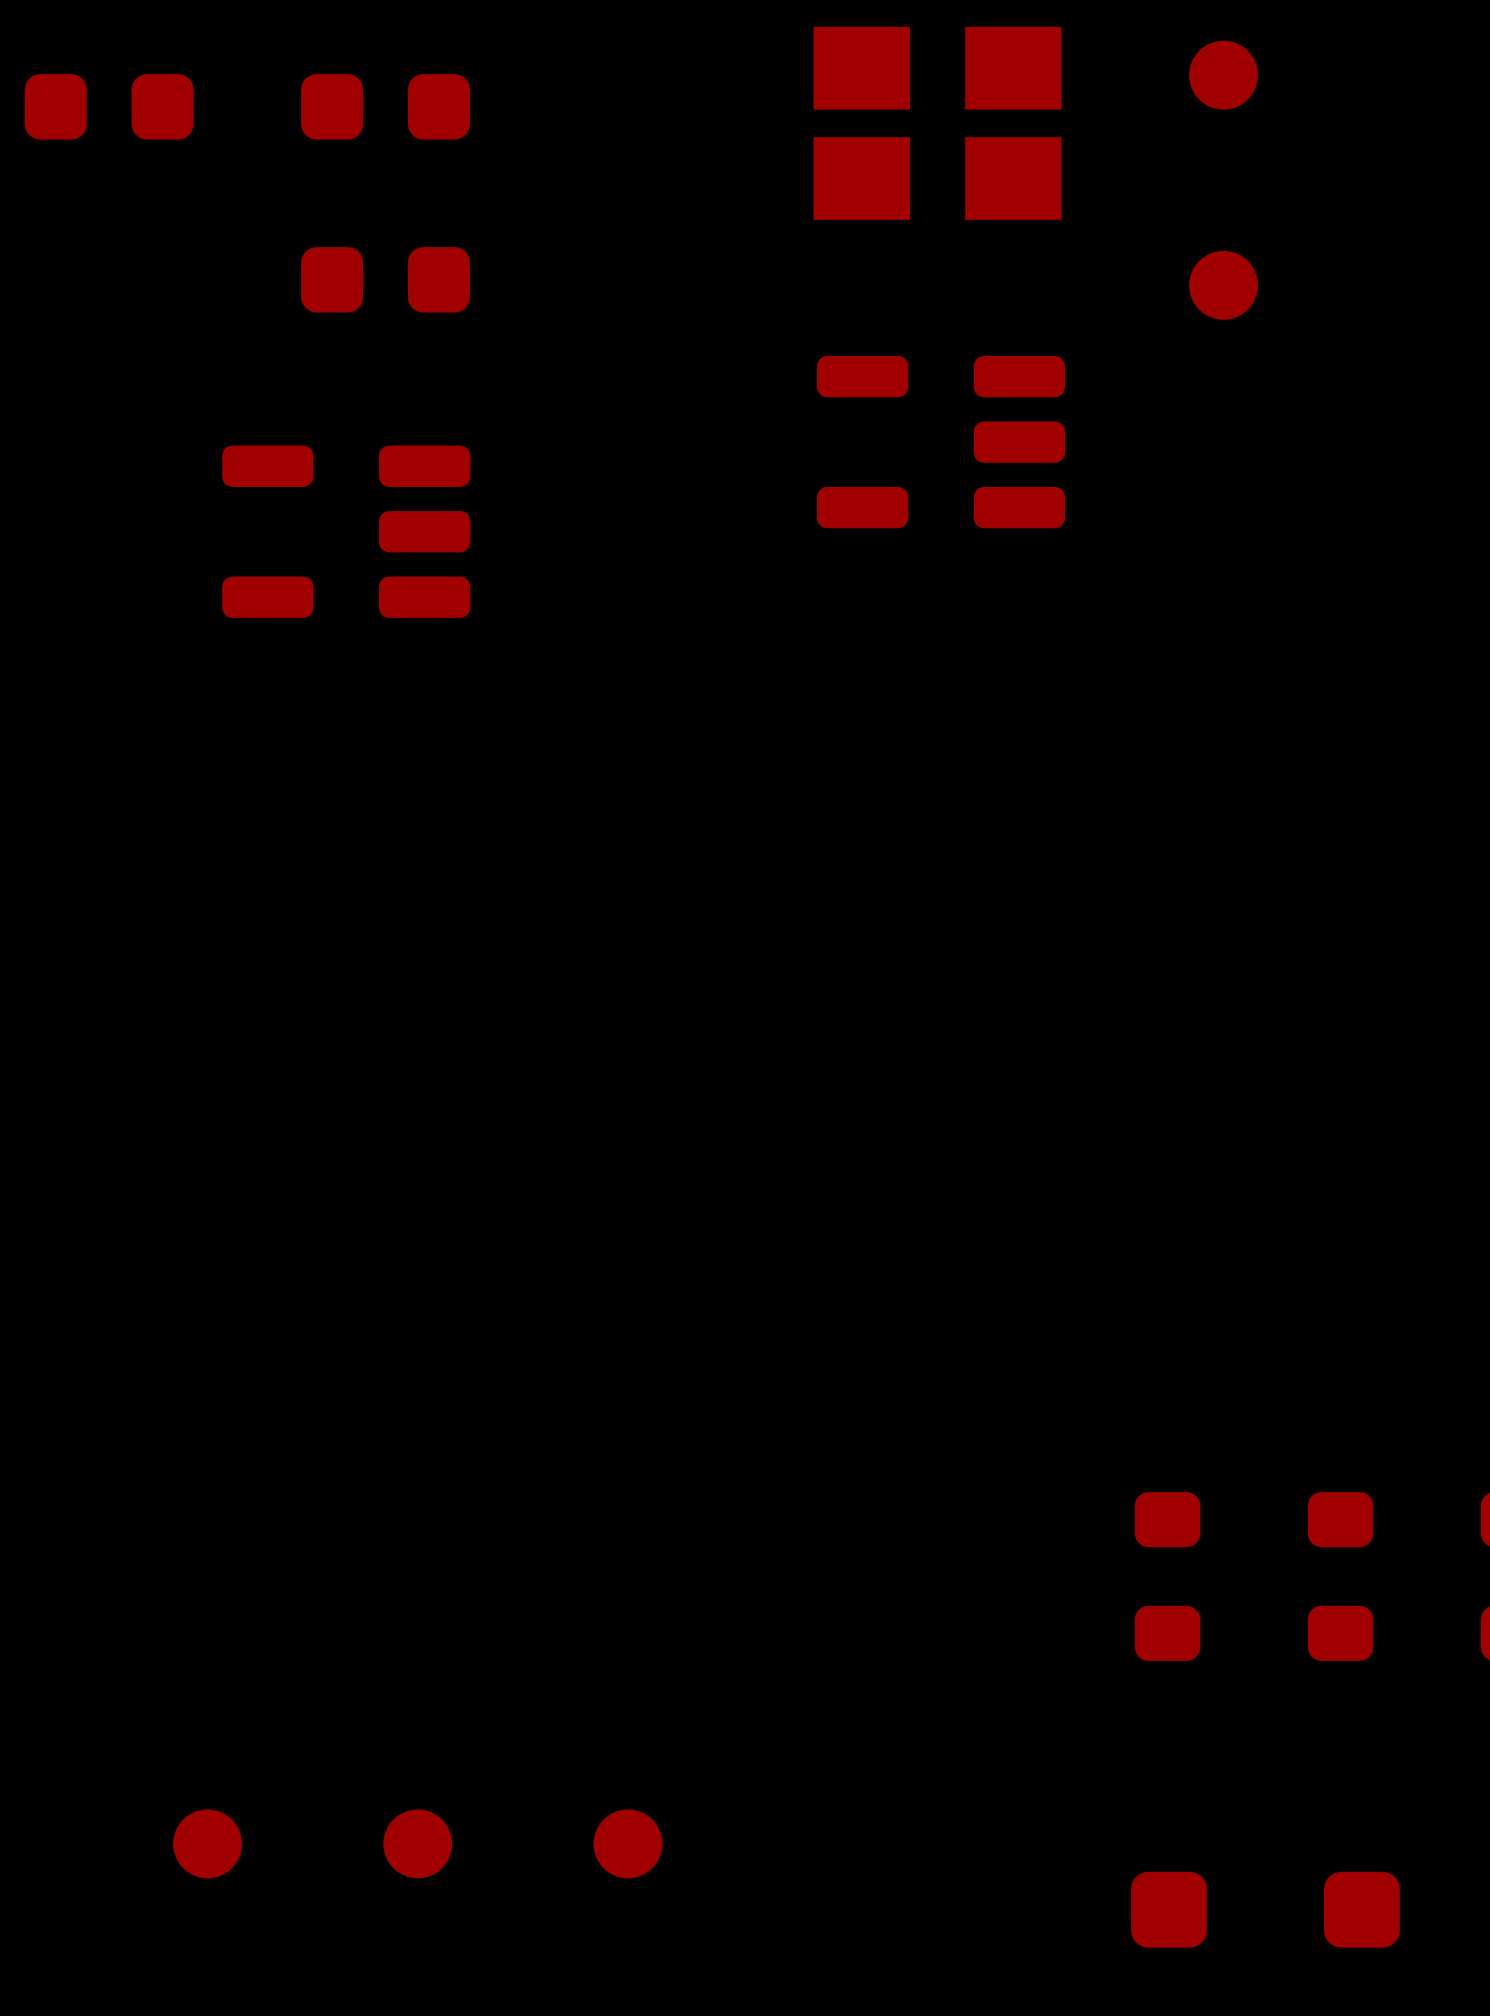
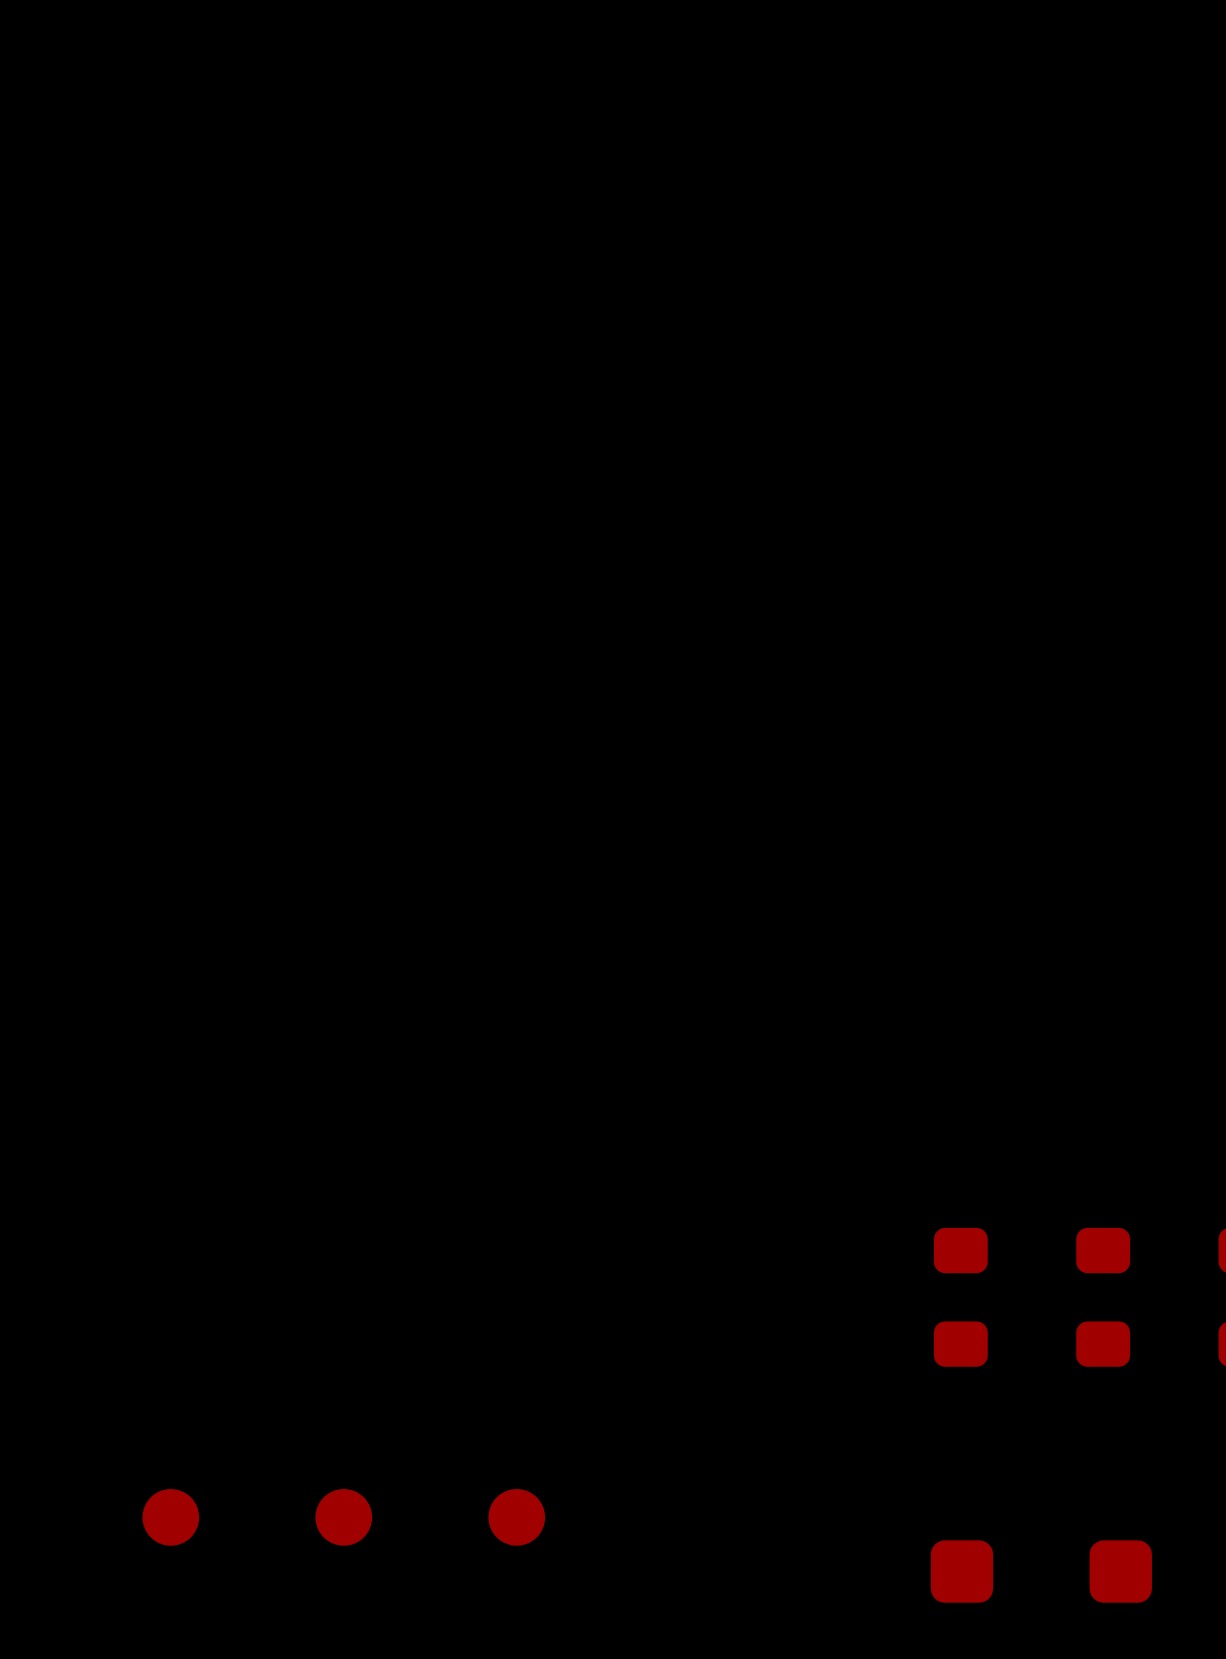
part: (1223, 75) -> none
part: (109, 106) -> none
part: (385, 106) -> none
part: (937, 123) -> none
part: (385, 279) -> none
part: (1223, 285) -> none
part: (941, 442) -> none
part: (346, 531) -> none

